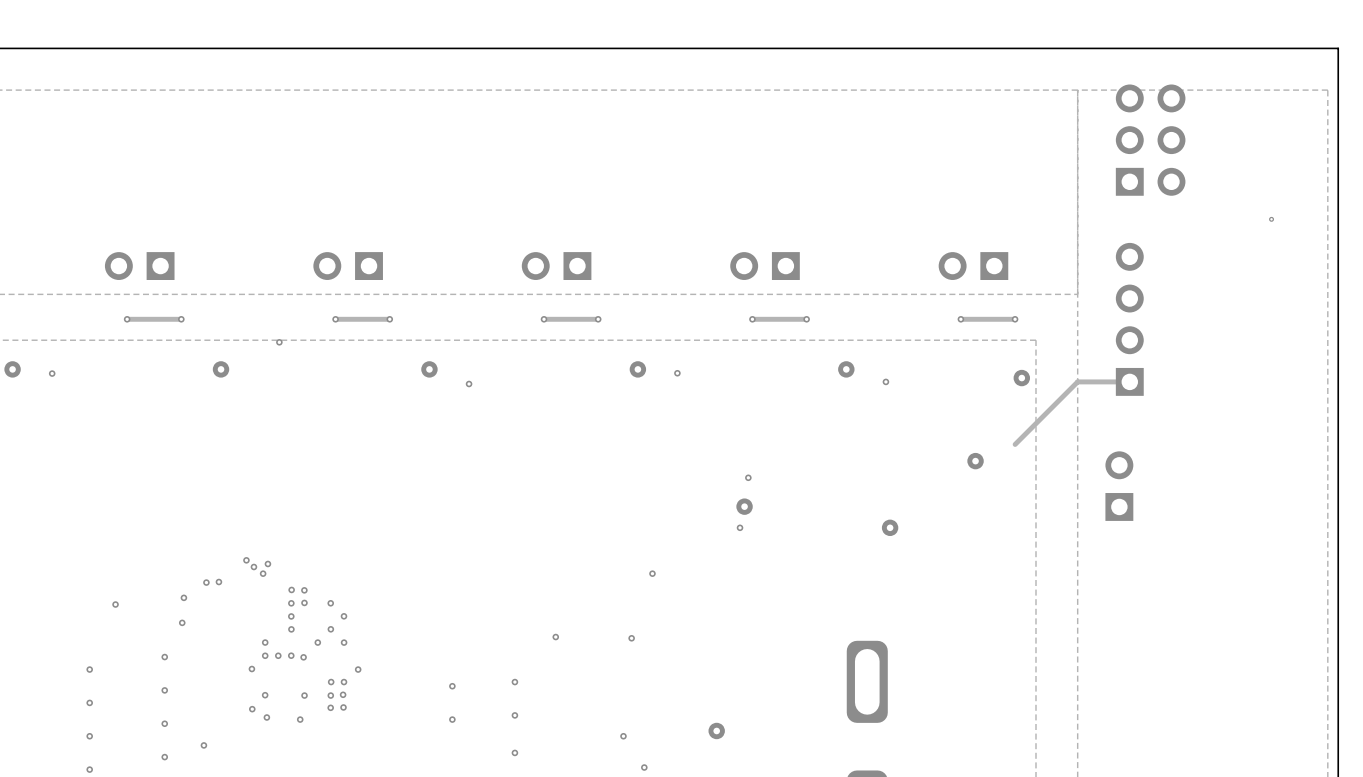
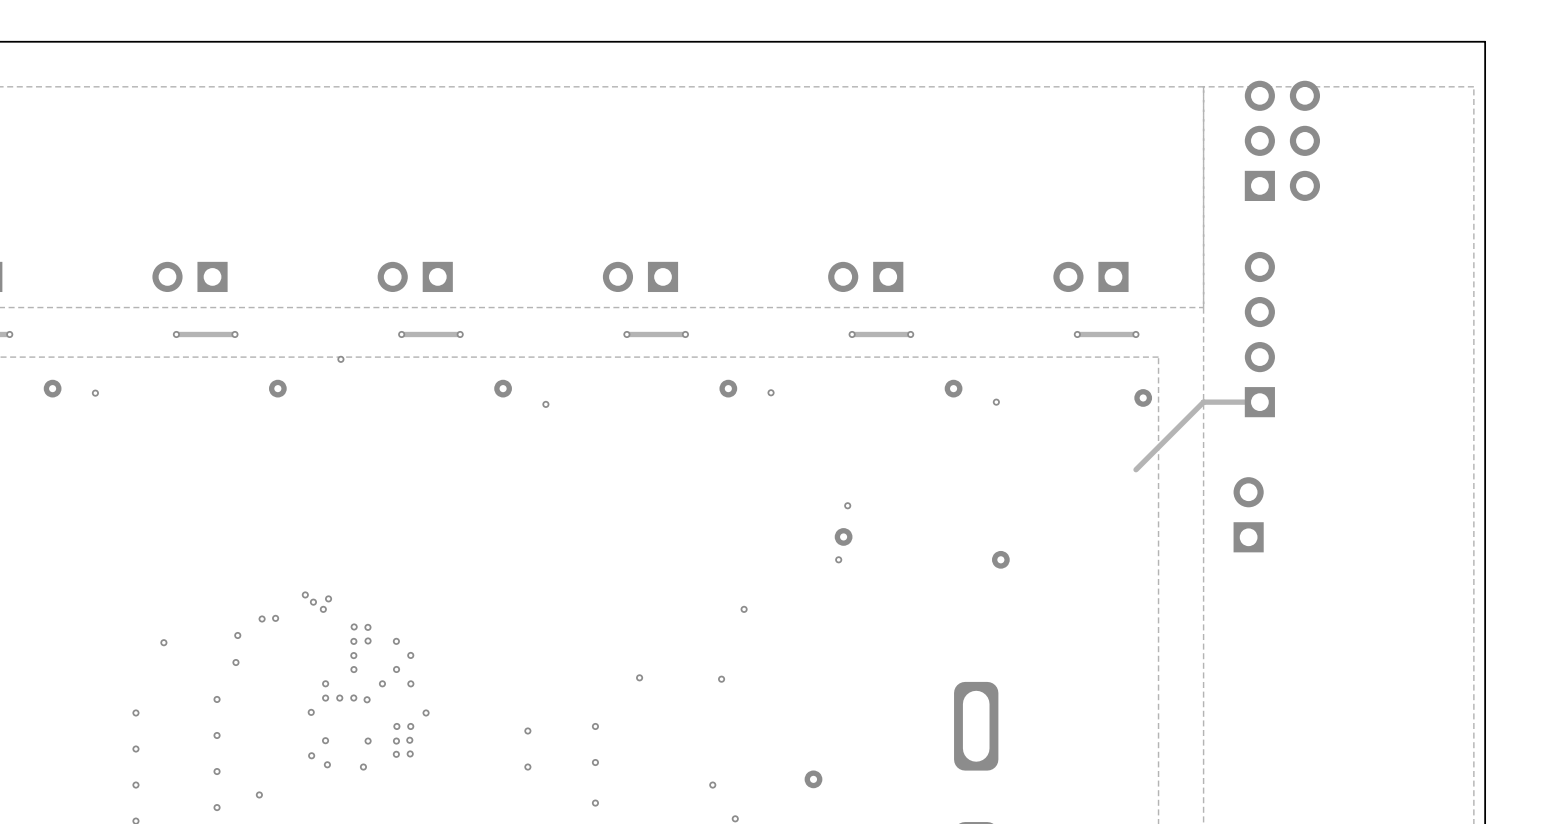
via: (1271, 219) -> none
via: (975, 461) -> none

